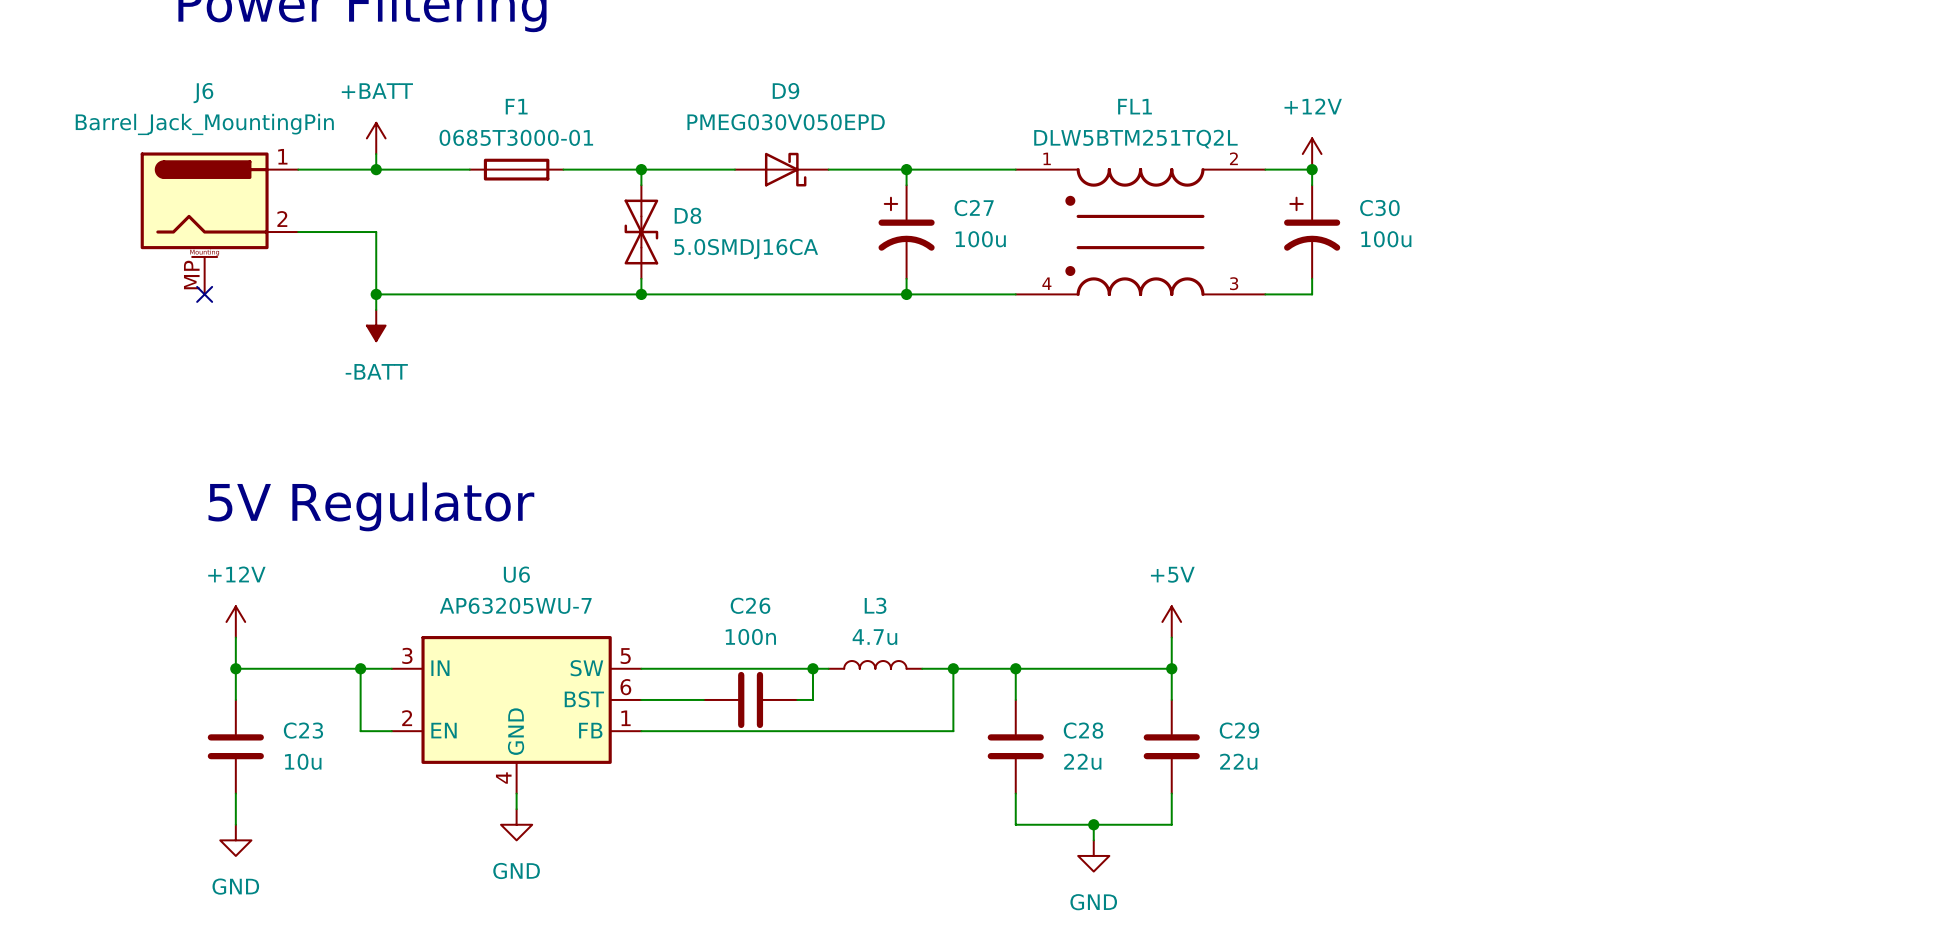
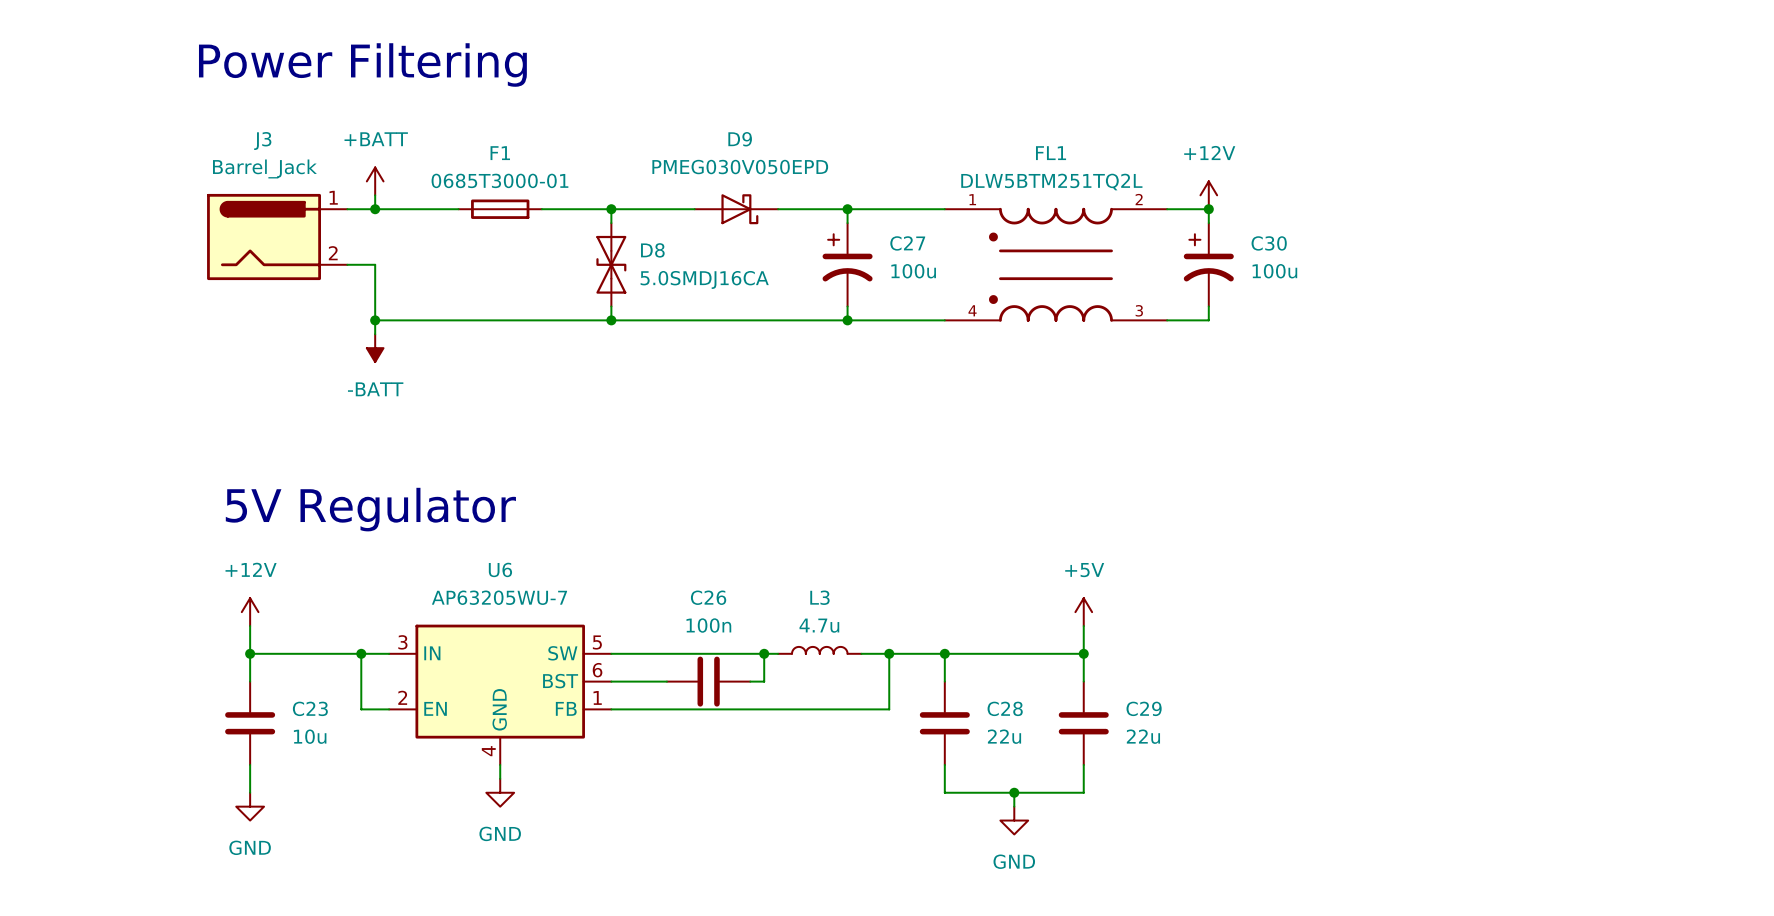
J3: none -> Barrel_Jack (277, 237)
J6: Barrel_Jack_MountingPin (219, 223) -> none
no-connect mark: (204, 294) -> none

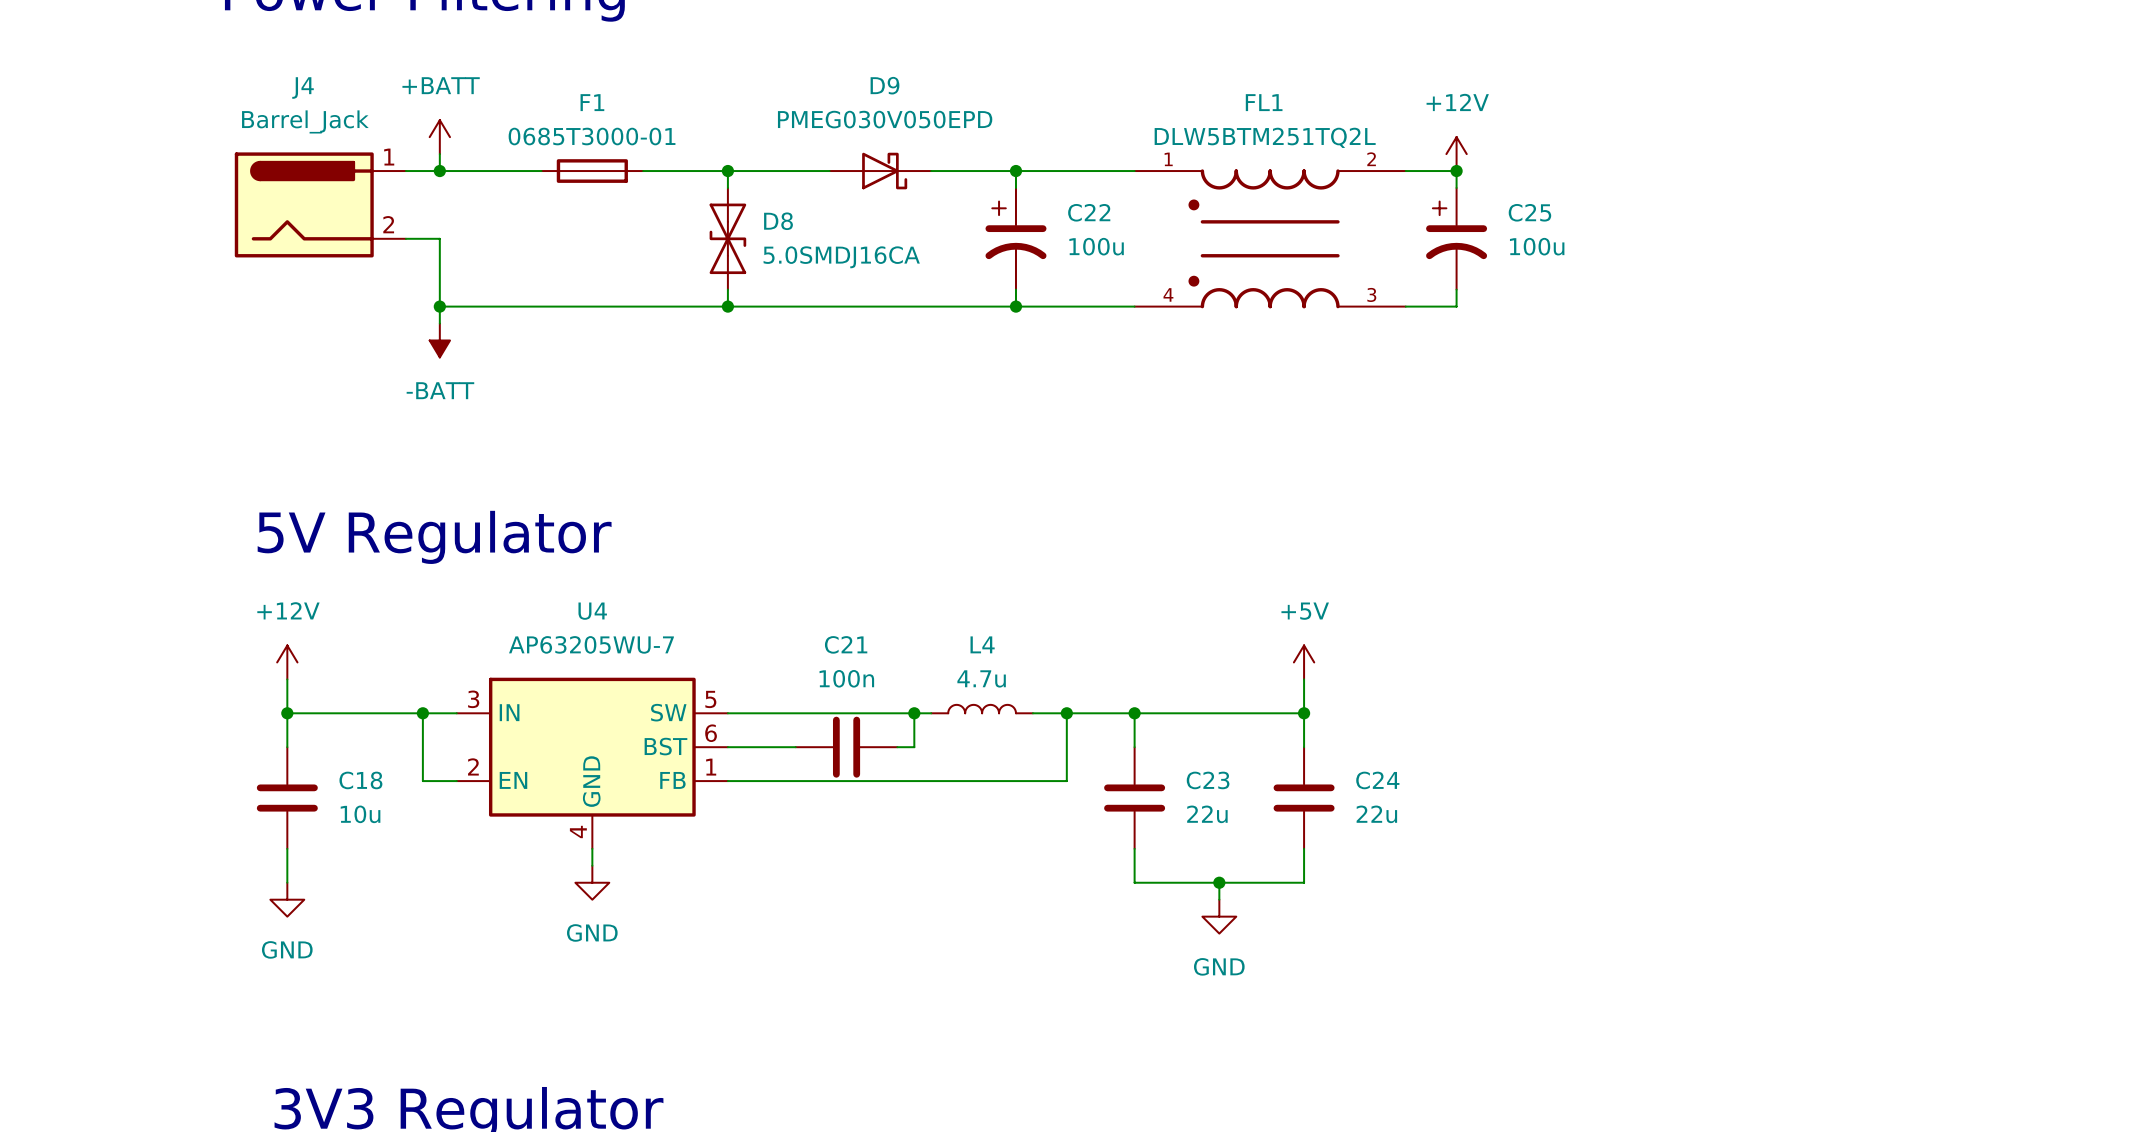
J3 name: J3 (262, 141) -> J4 (303, 87)
C27 name: C27 (907, 243) -> C22 (1089, 212)
C30 name: C30 (1269, 243) -> C25 (1529, 212)
U6 name: U6 (500, 569) -> U4 (592, 611)
C26 name: C26 (708, 597) -> C21 (846, 644)
L3 name: L3 (819, 597) -> L4 (982, 644)
C23 name: C23 (310, 708) -> C18 (360, 780)
C28 name: C28 (1005, 708) -> C23 (1208, 780)
C29 name: C29 (1144, 708) -> C24 (1377, 780)

